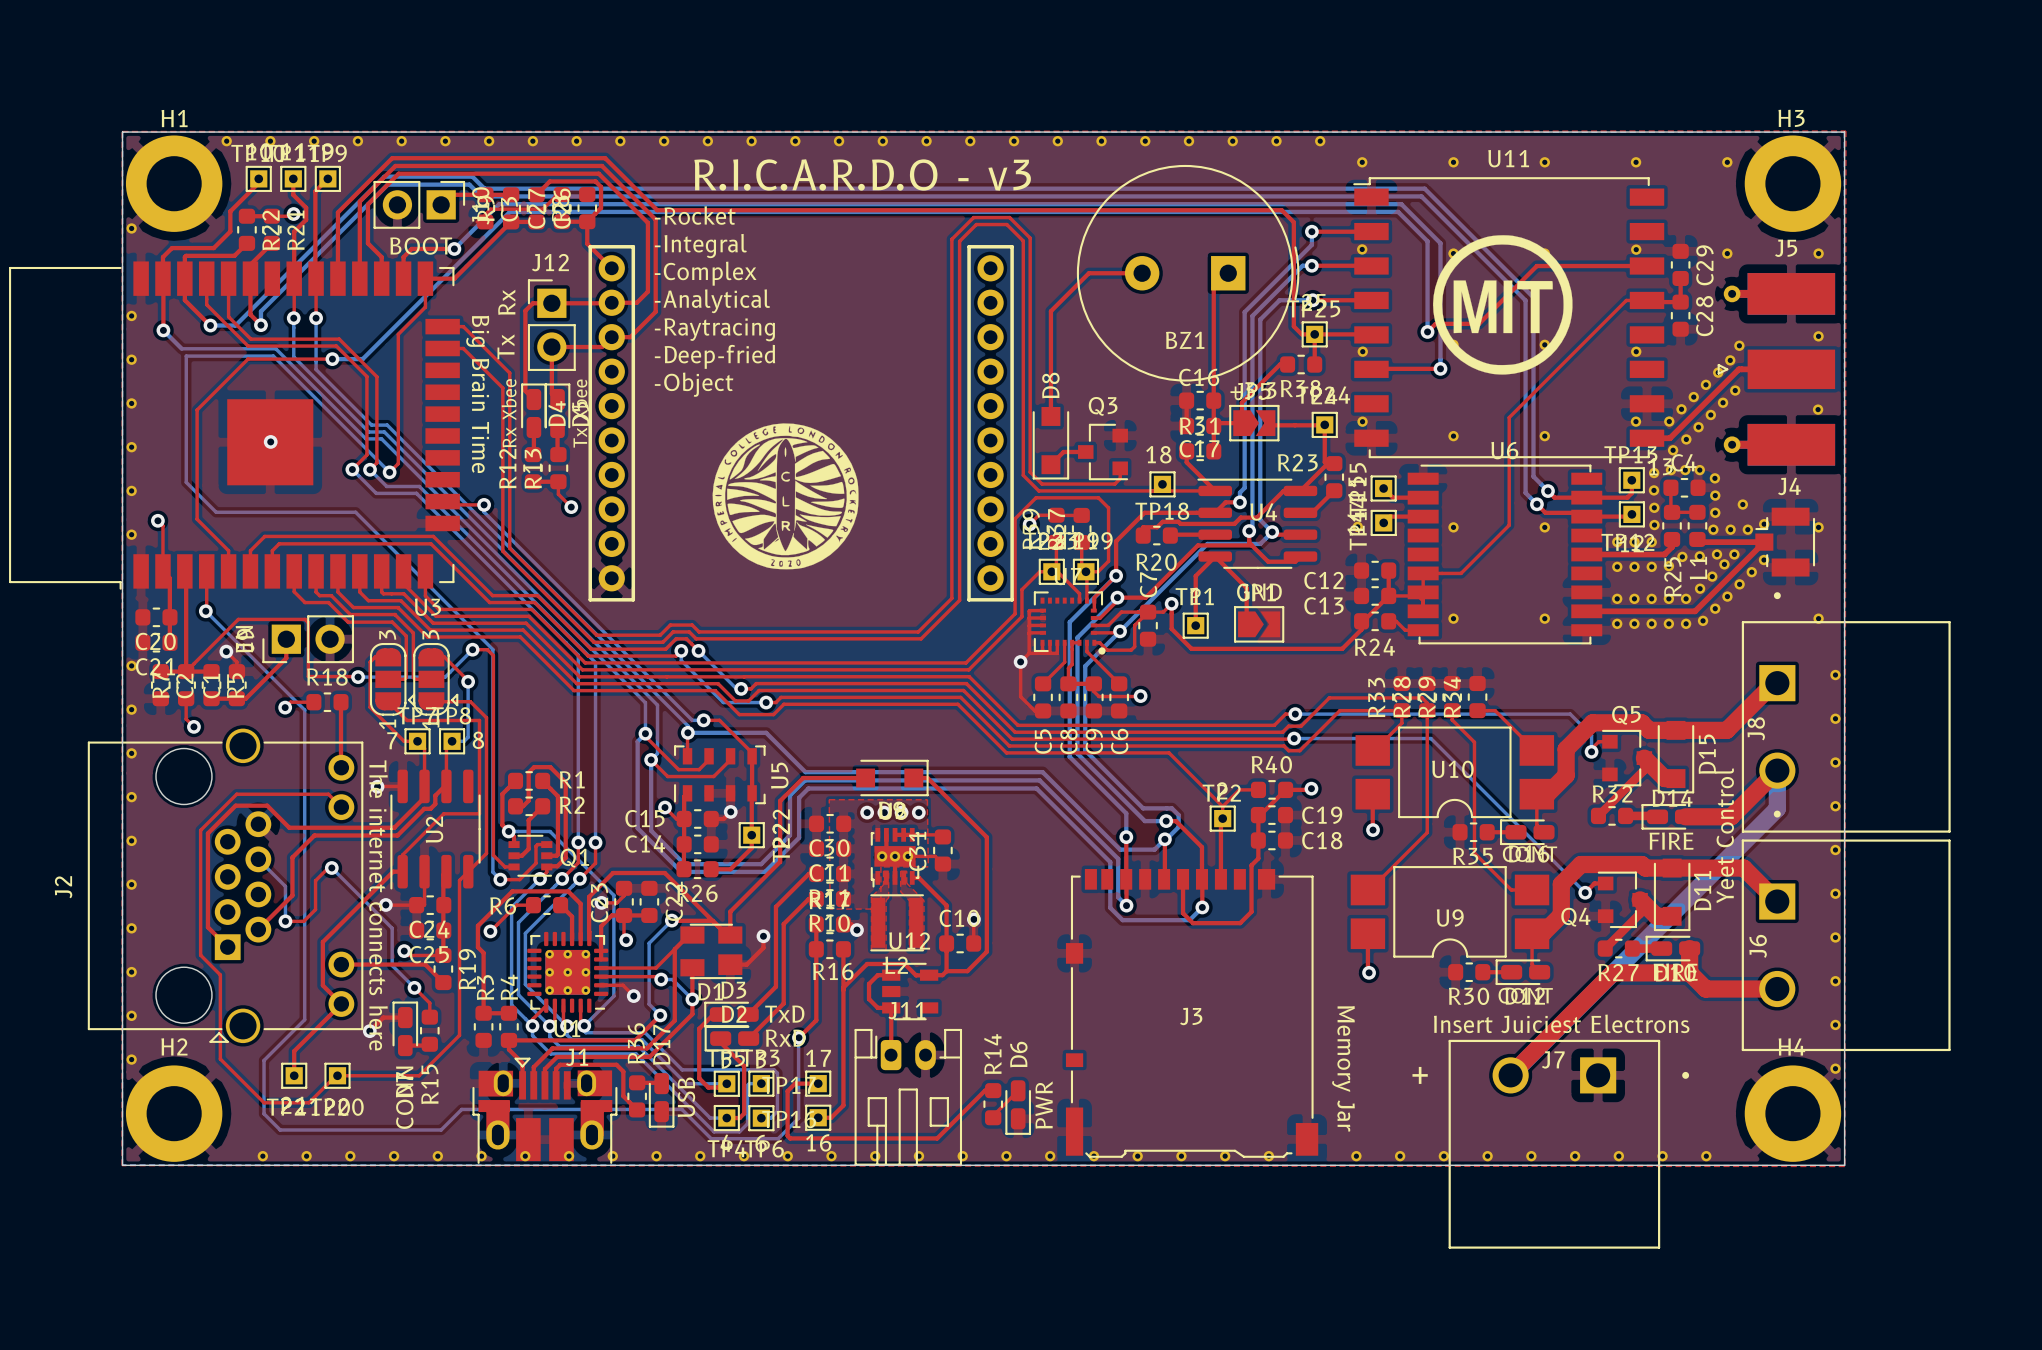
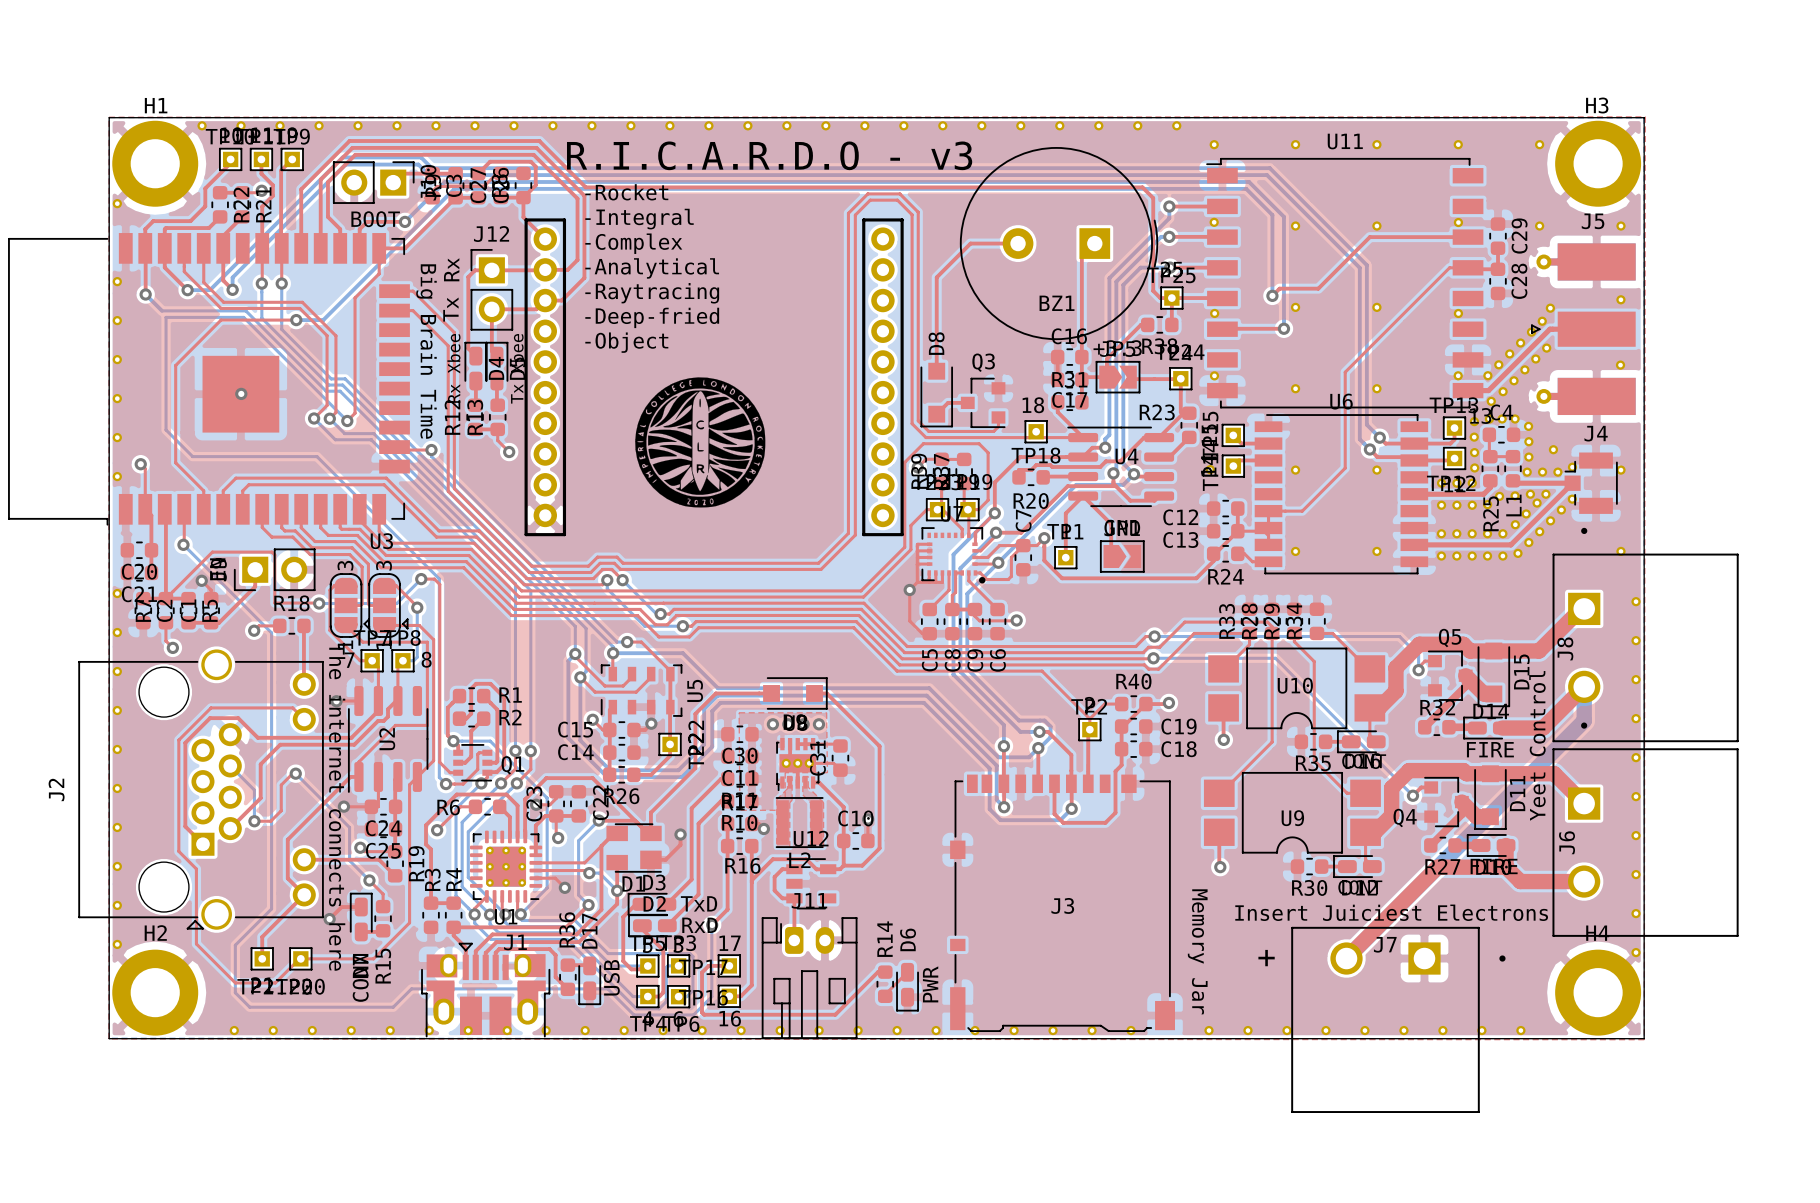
drawing: [1433, 235, 1573, 375] -> none

